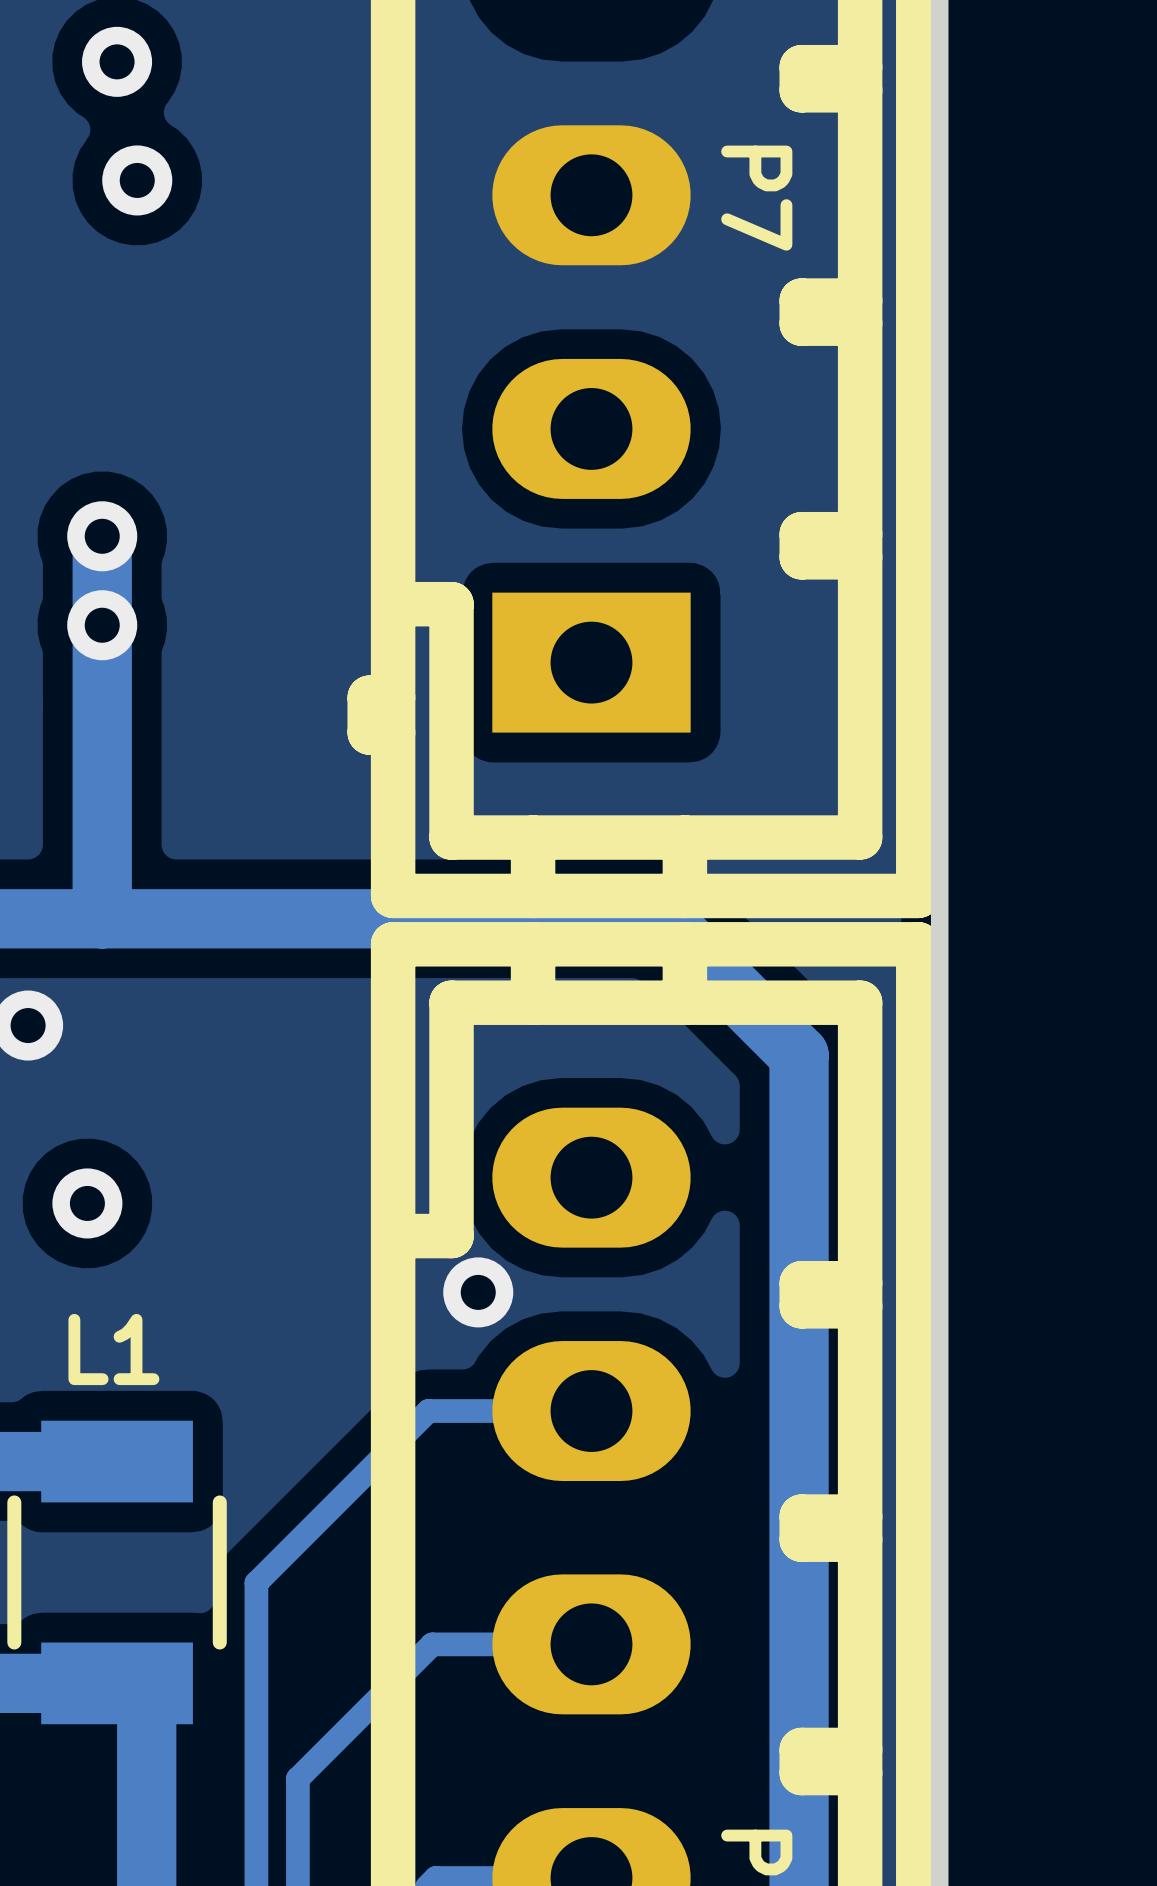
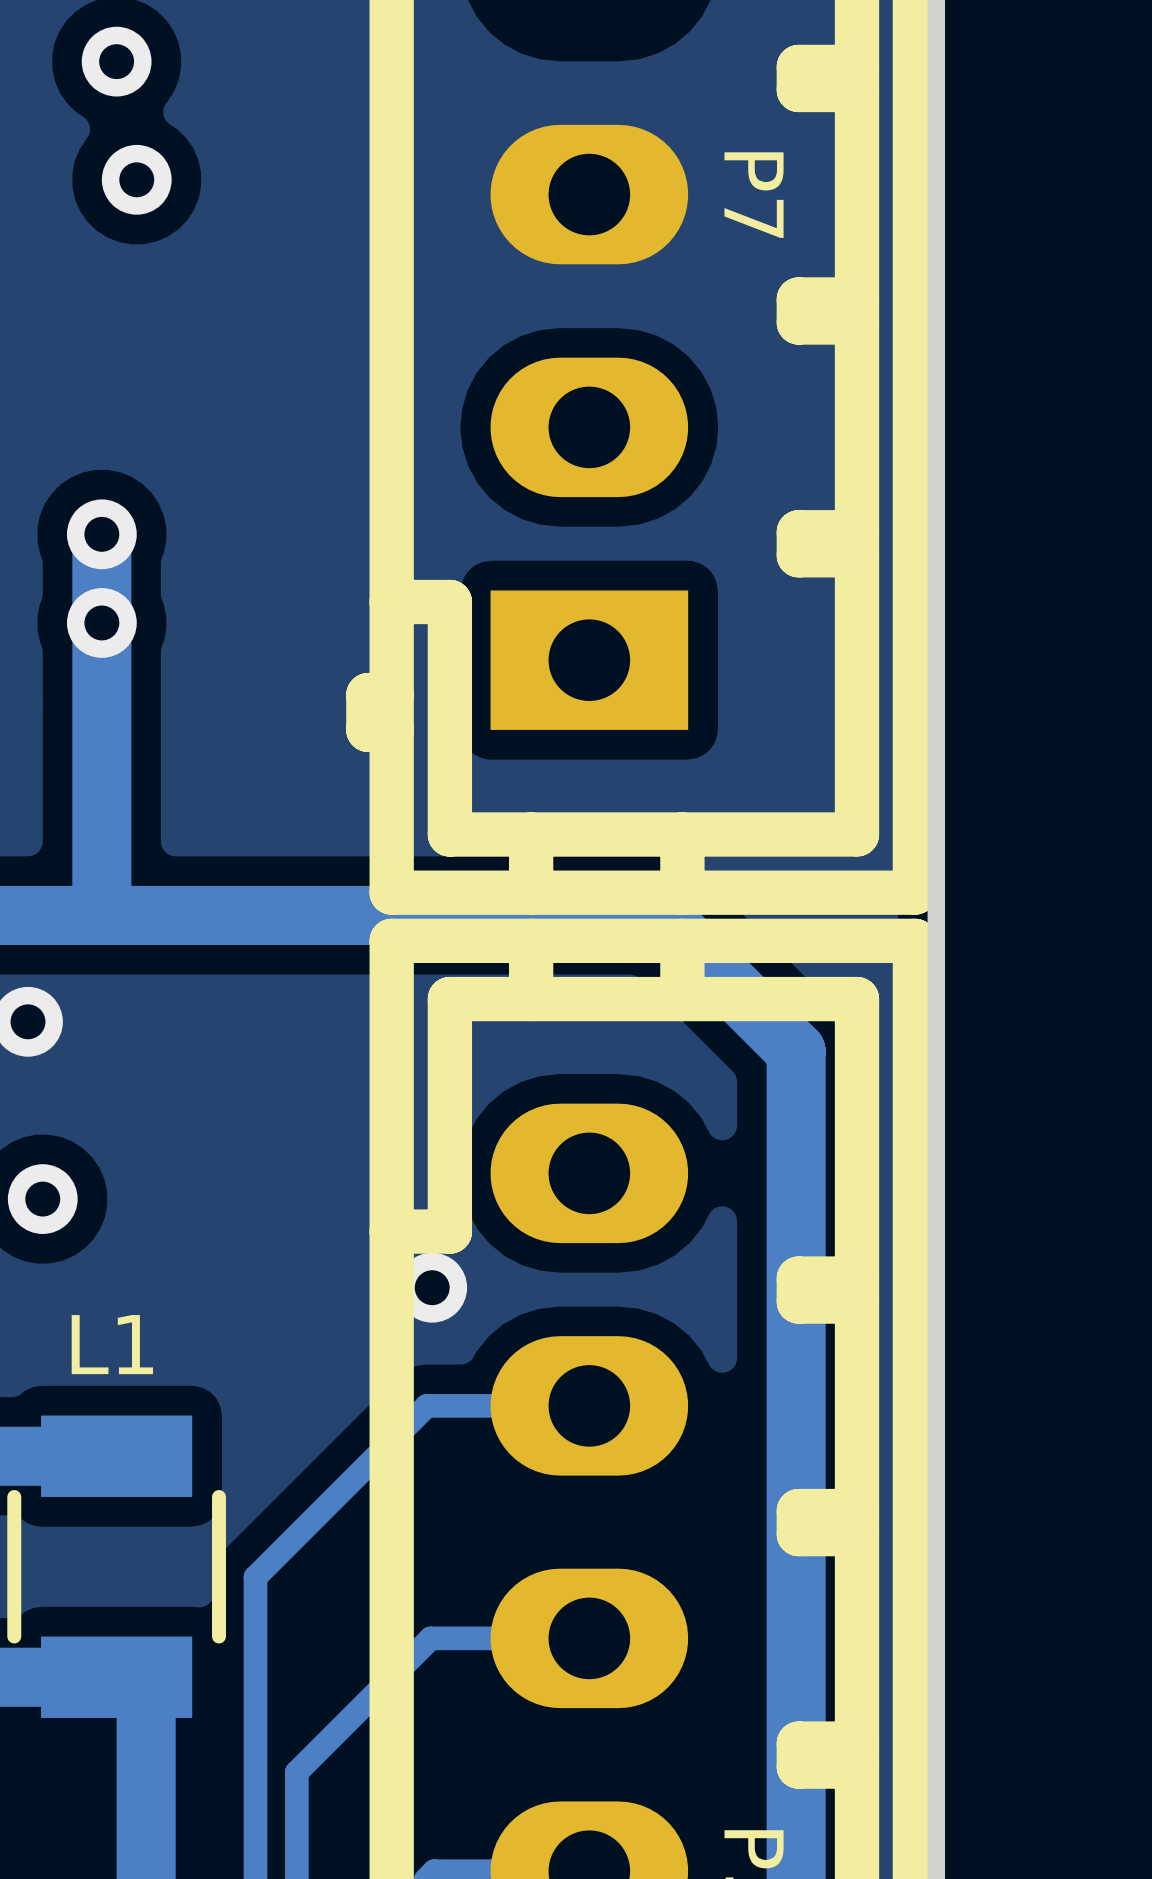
via position: (87, 1203) -> (42, 1199)
via position: (478, 1292) -> (432, 1287)

